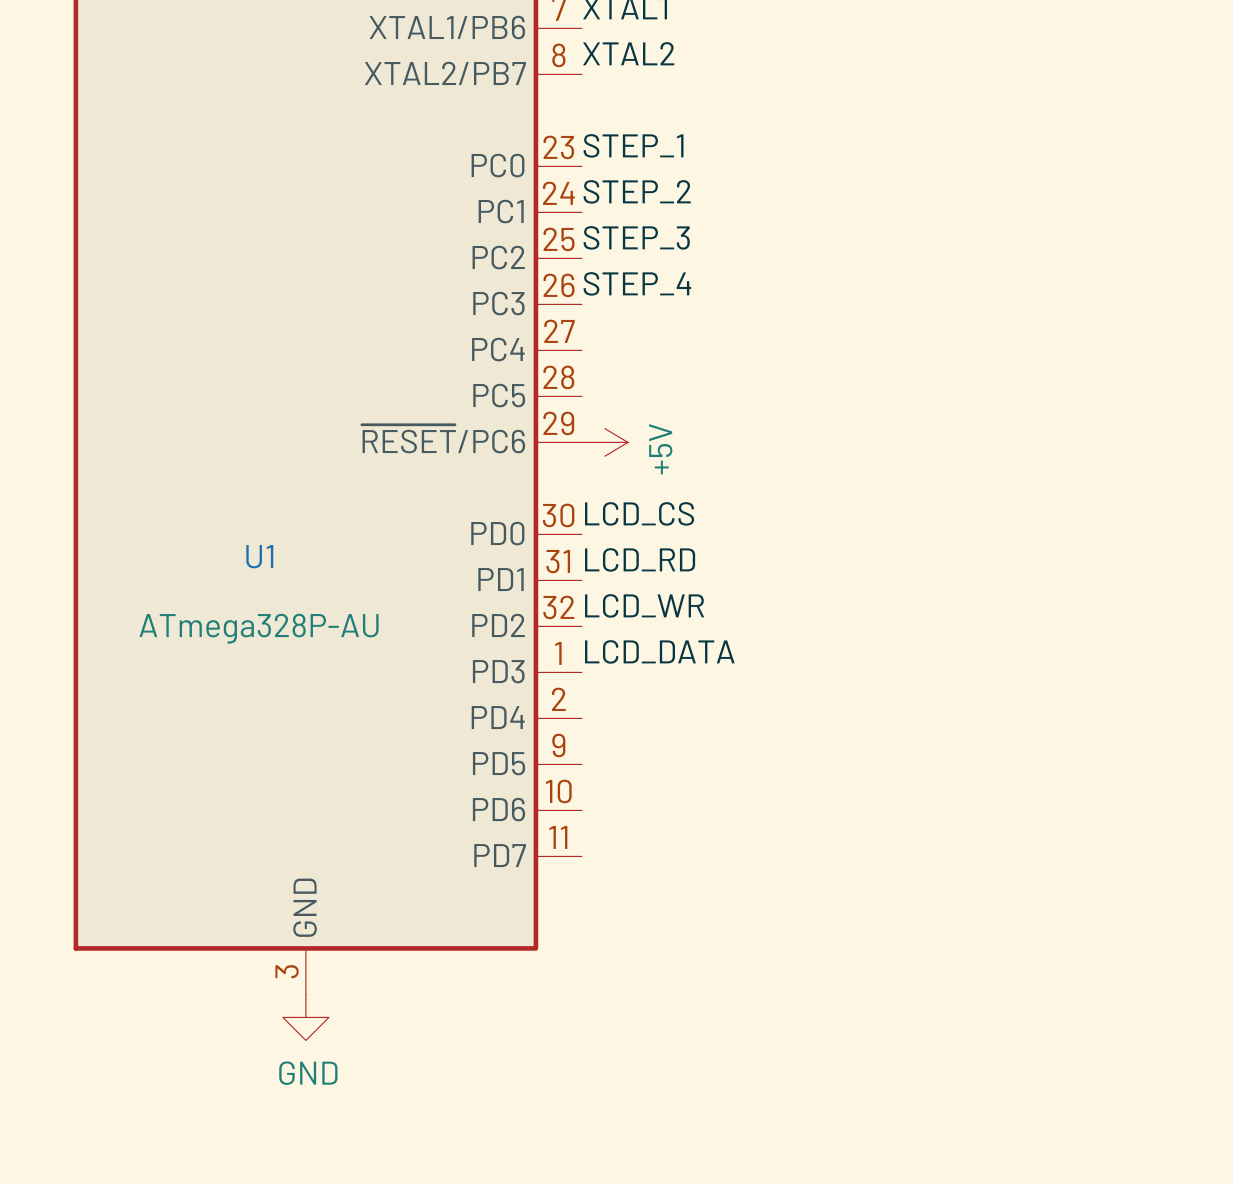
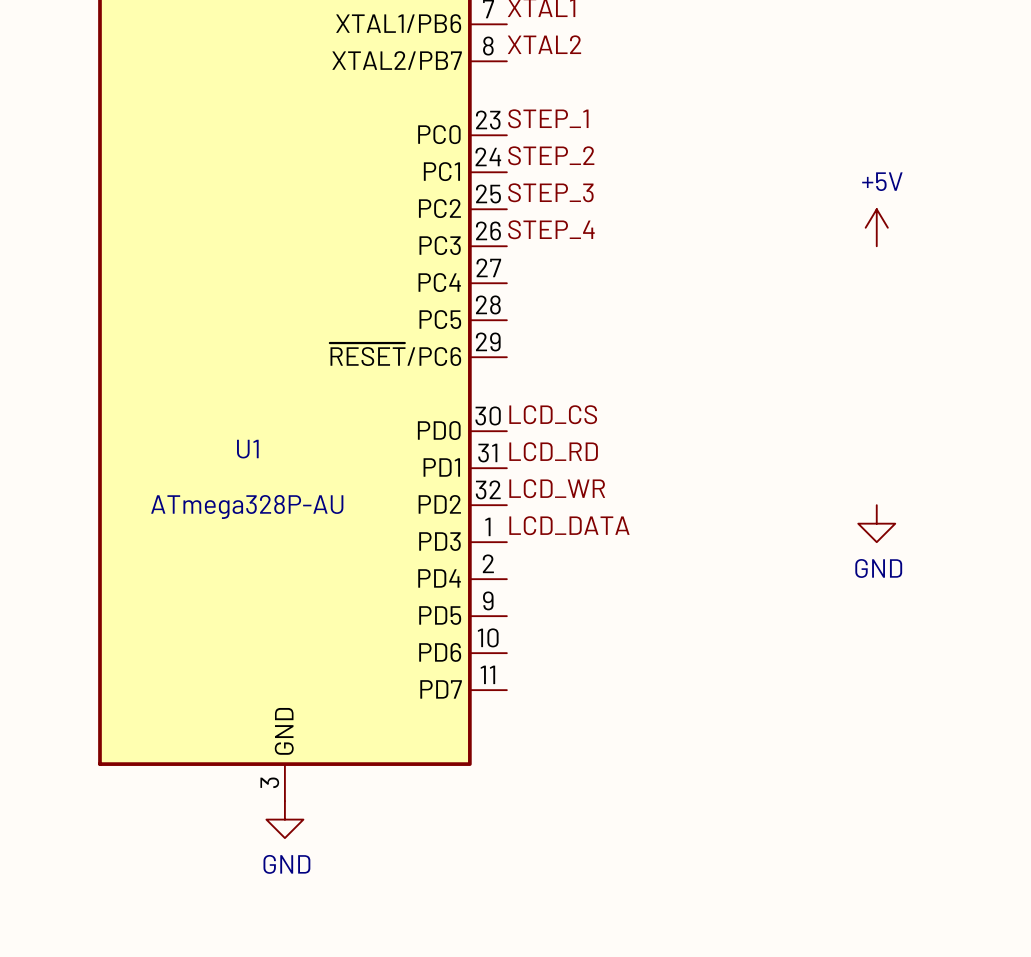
power symbol: none -> +5V (876, 227)
power symbol: +5V (604, 442) -> none
power symbol: none -> GND (876, 523)

